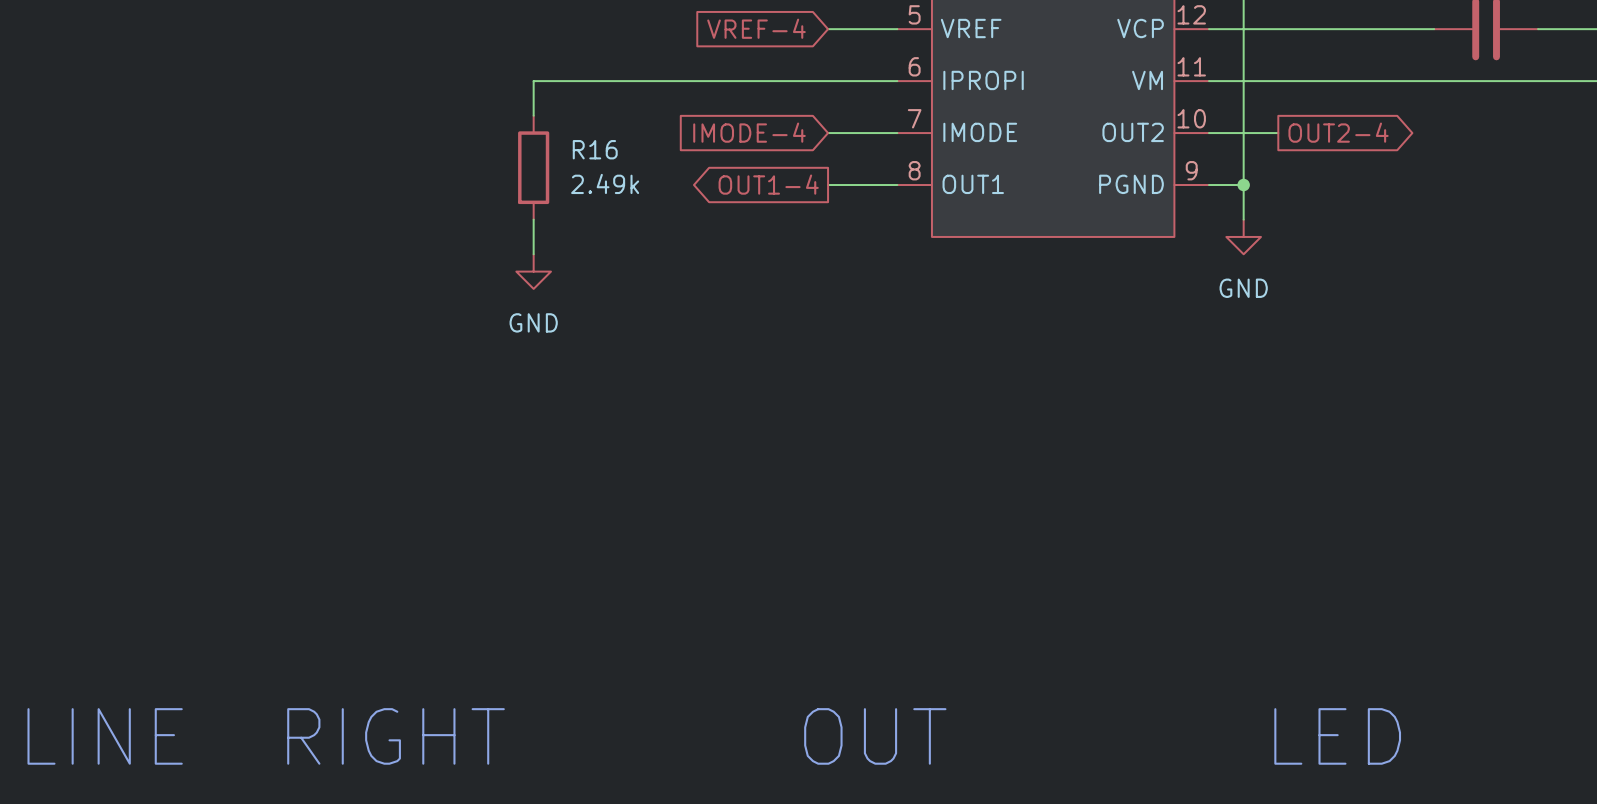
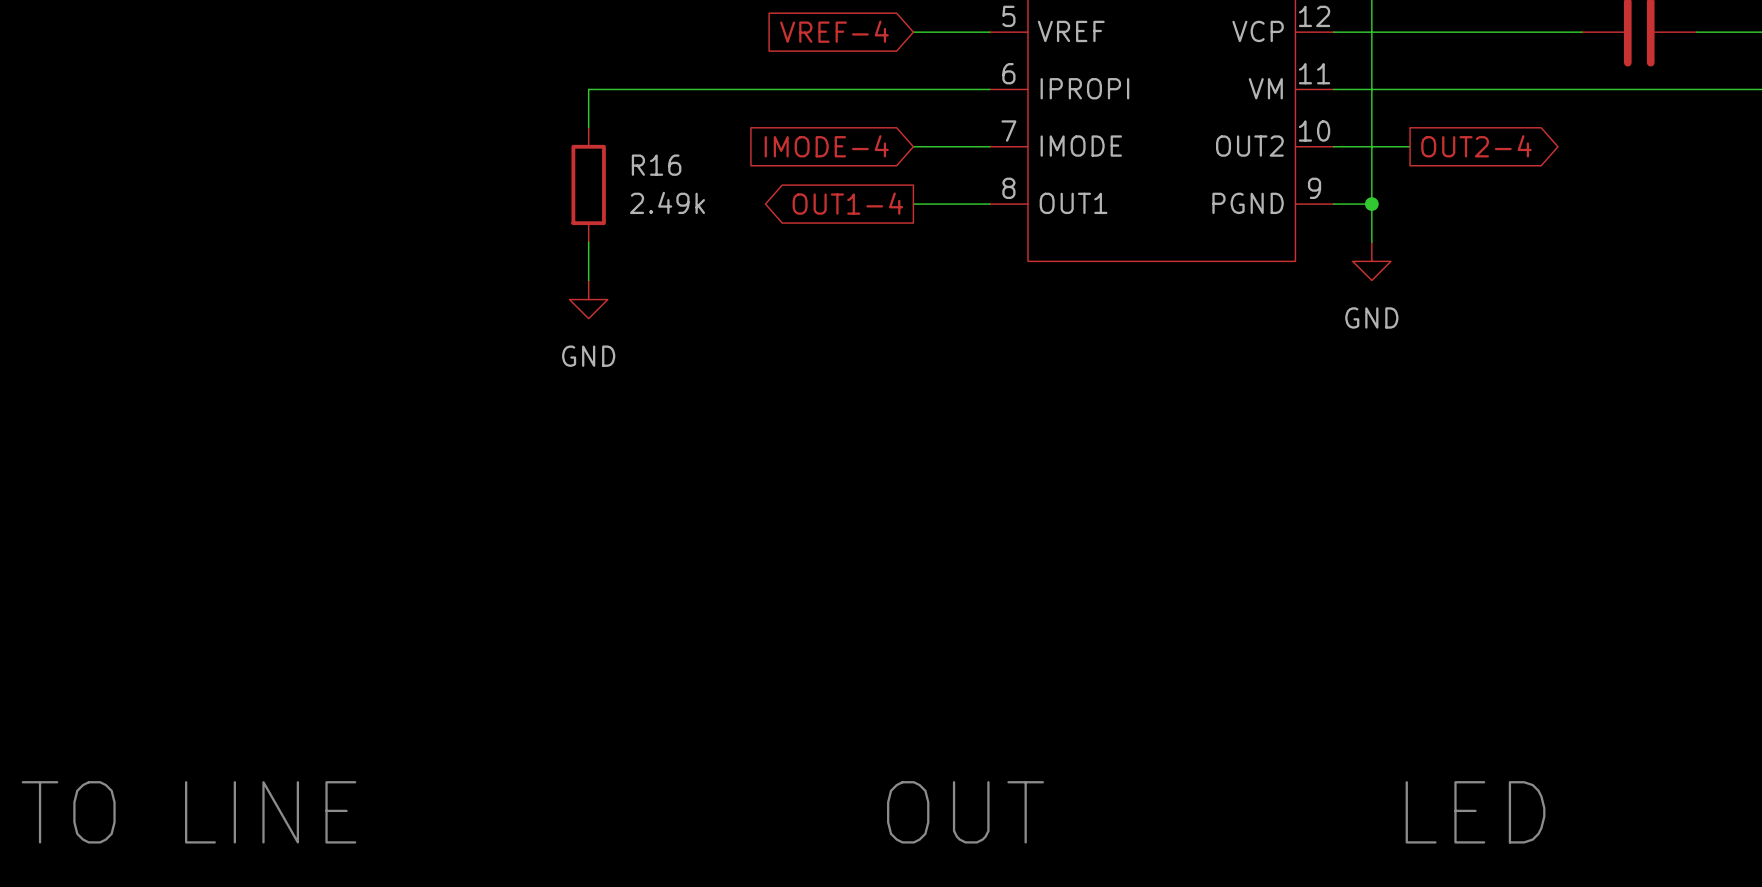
text: LINE RIGHT (266, 736) -> TO LINE (189, 812)

